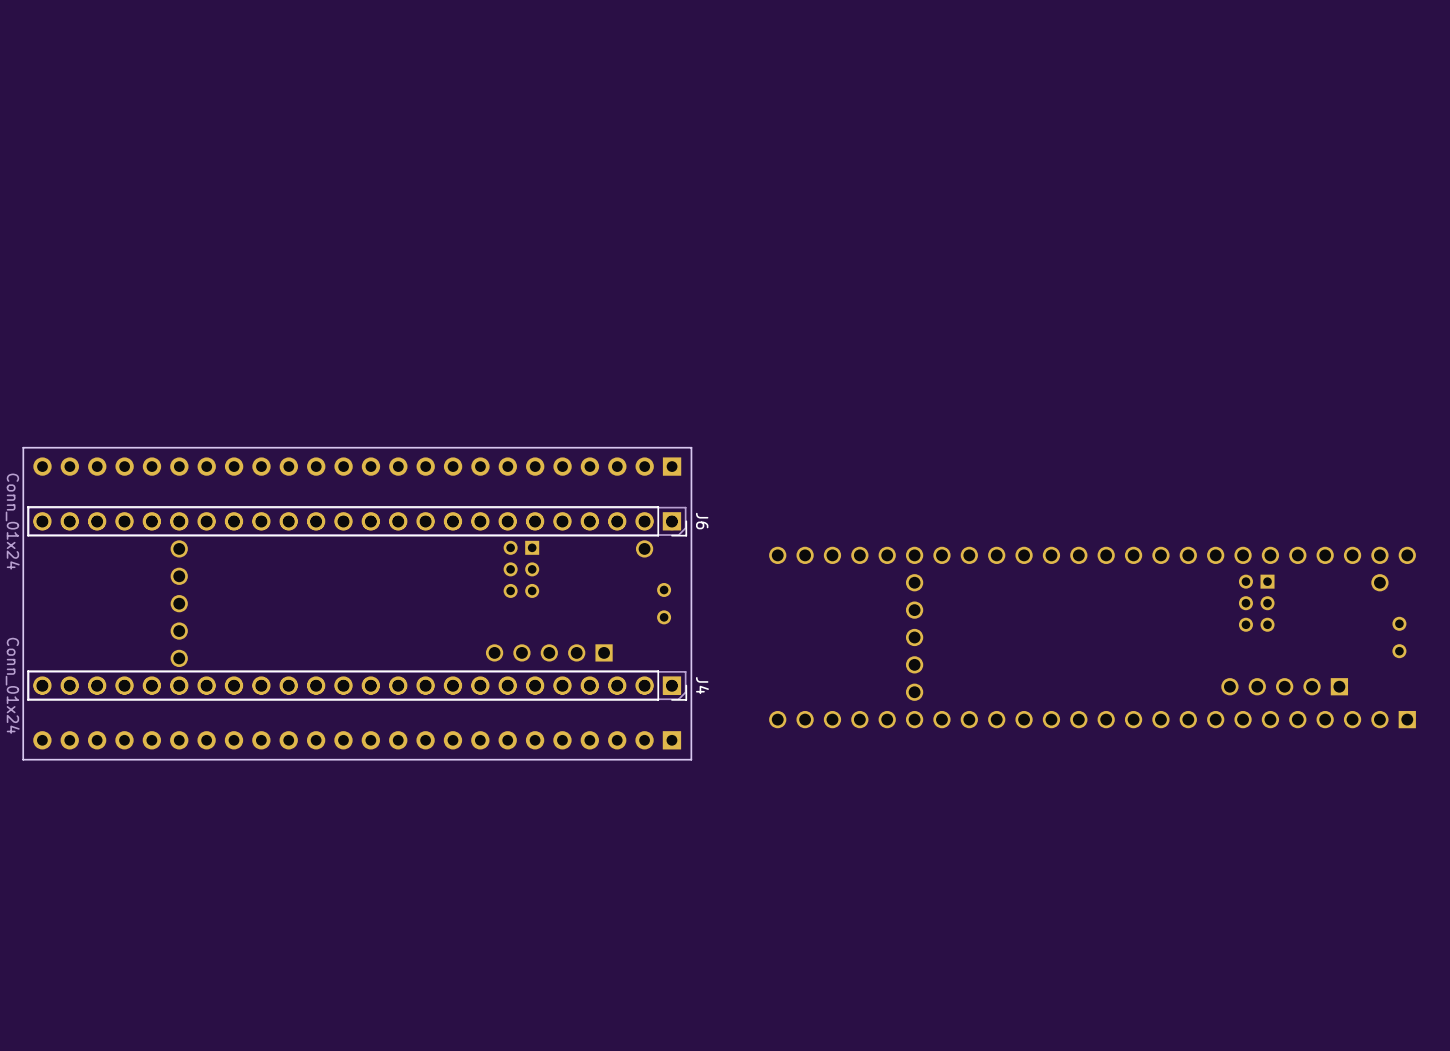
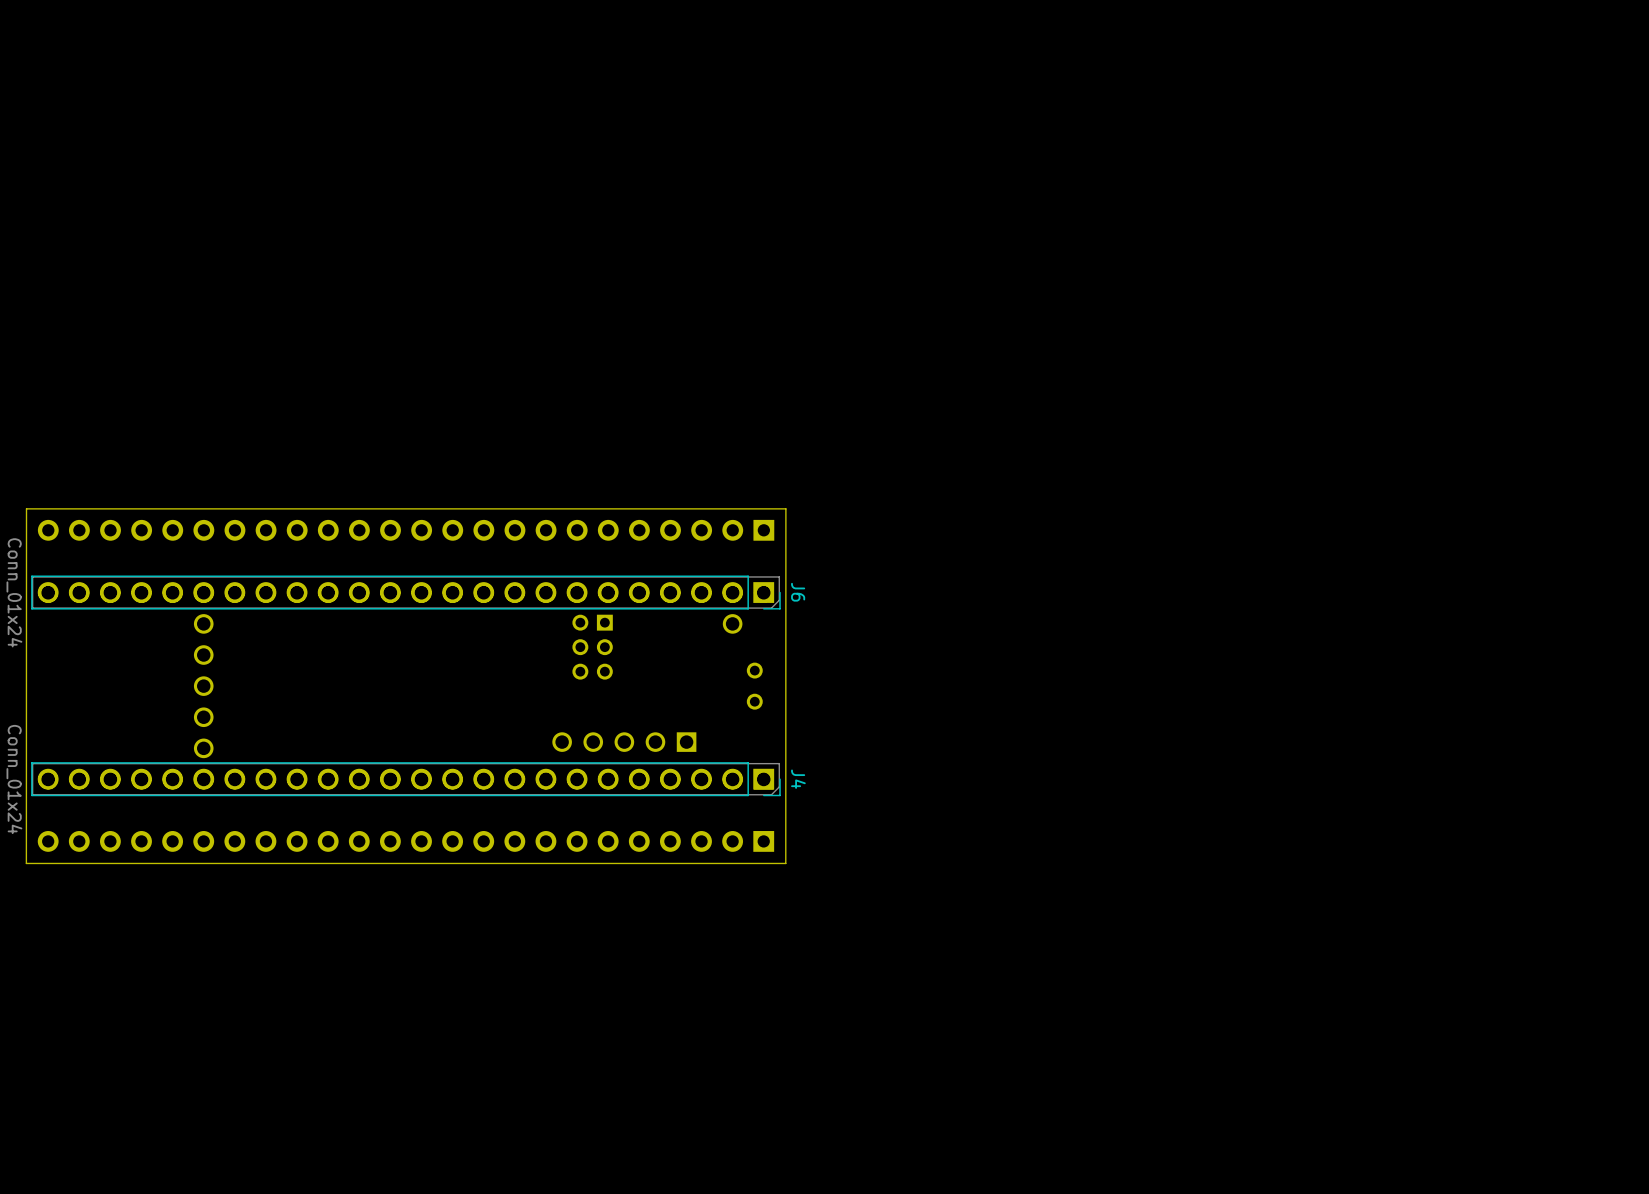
part: (1092, 637) -> none

